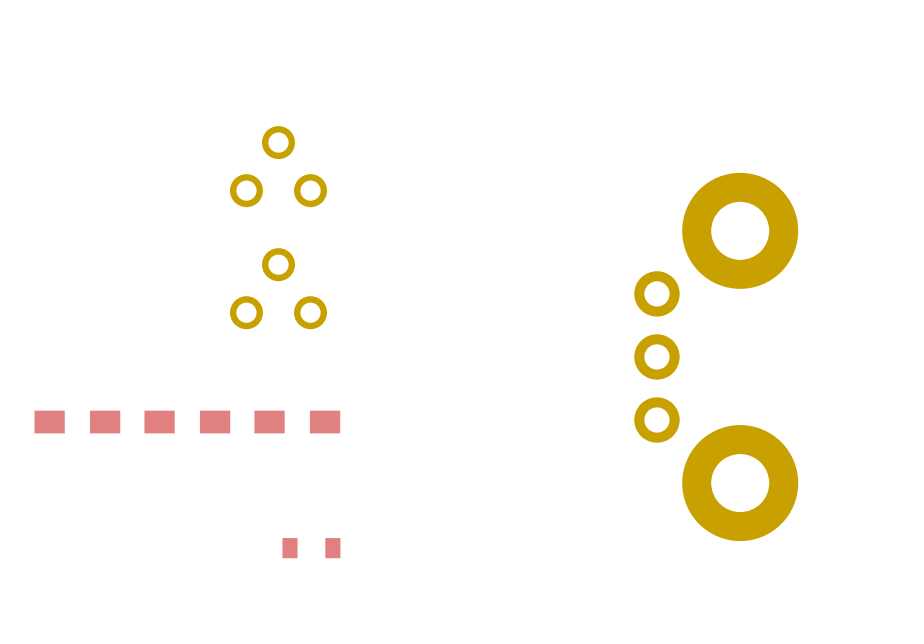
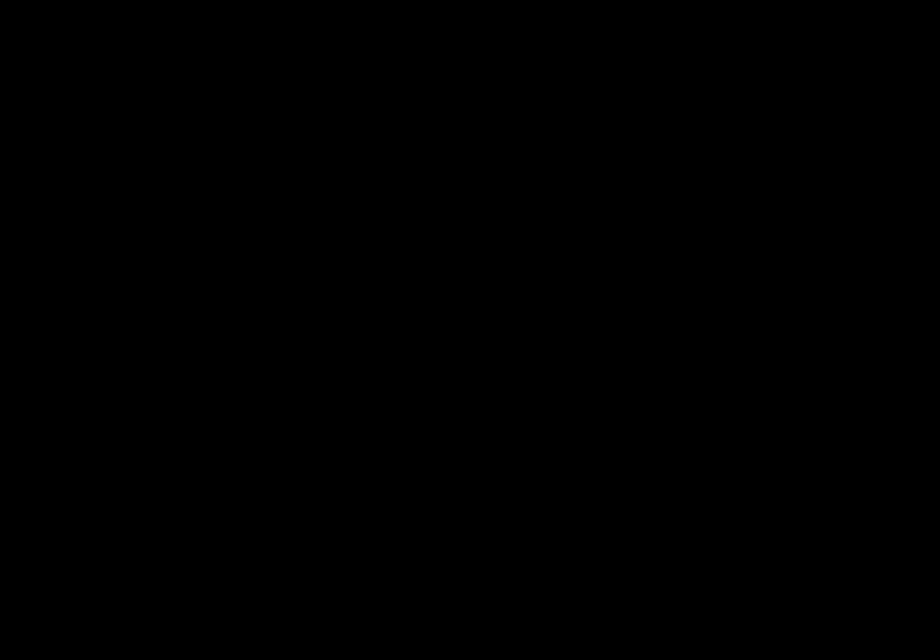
part: (278, 166) -> none
part: (278, 288) -> none
part: (716, 356) -> none
part: (77, 422) -> none
part: (187, 422) -> none
part: (297, 422) -> none
part: (311, 548) -> none

